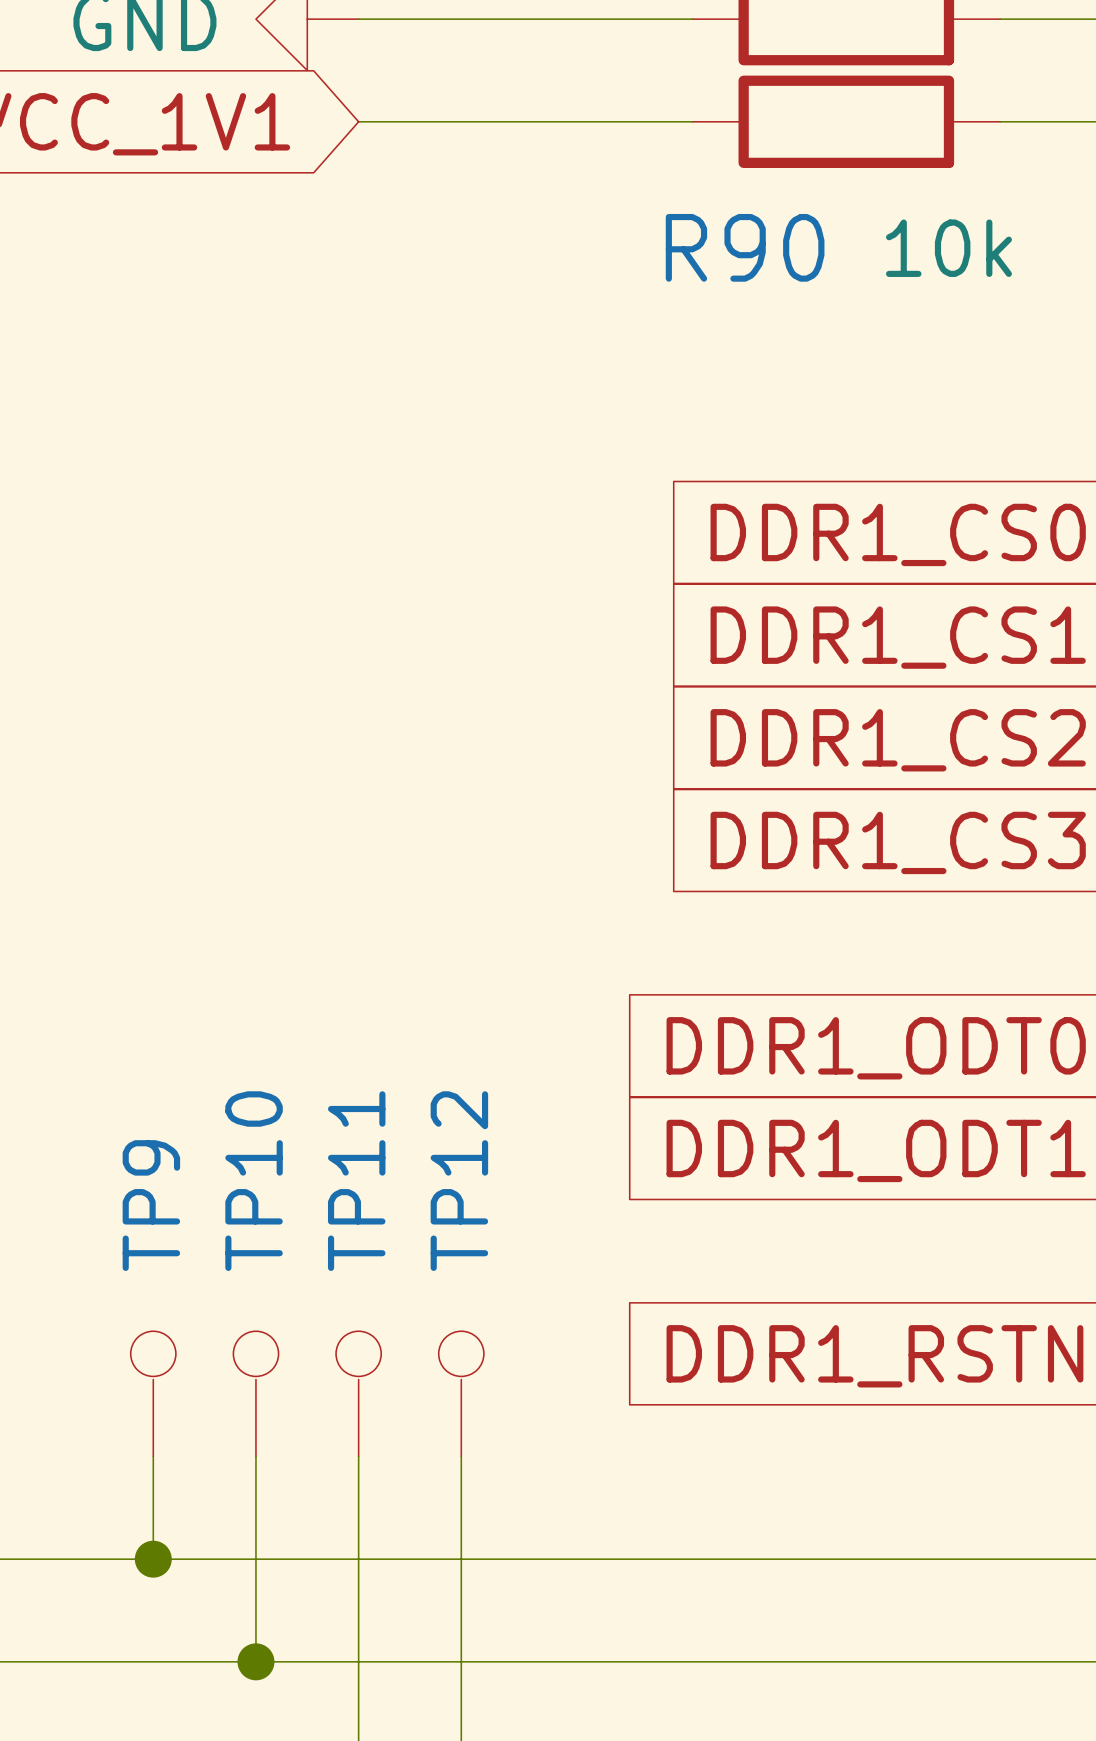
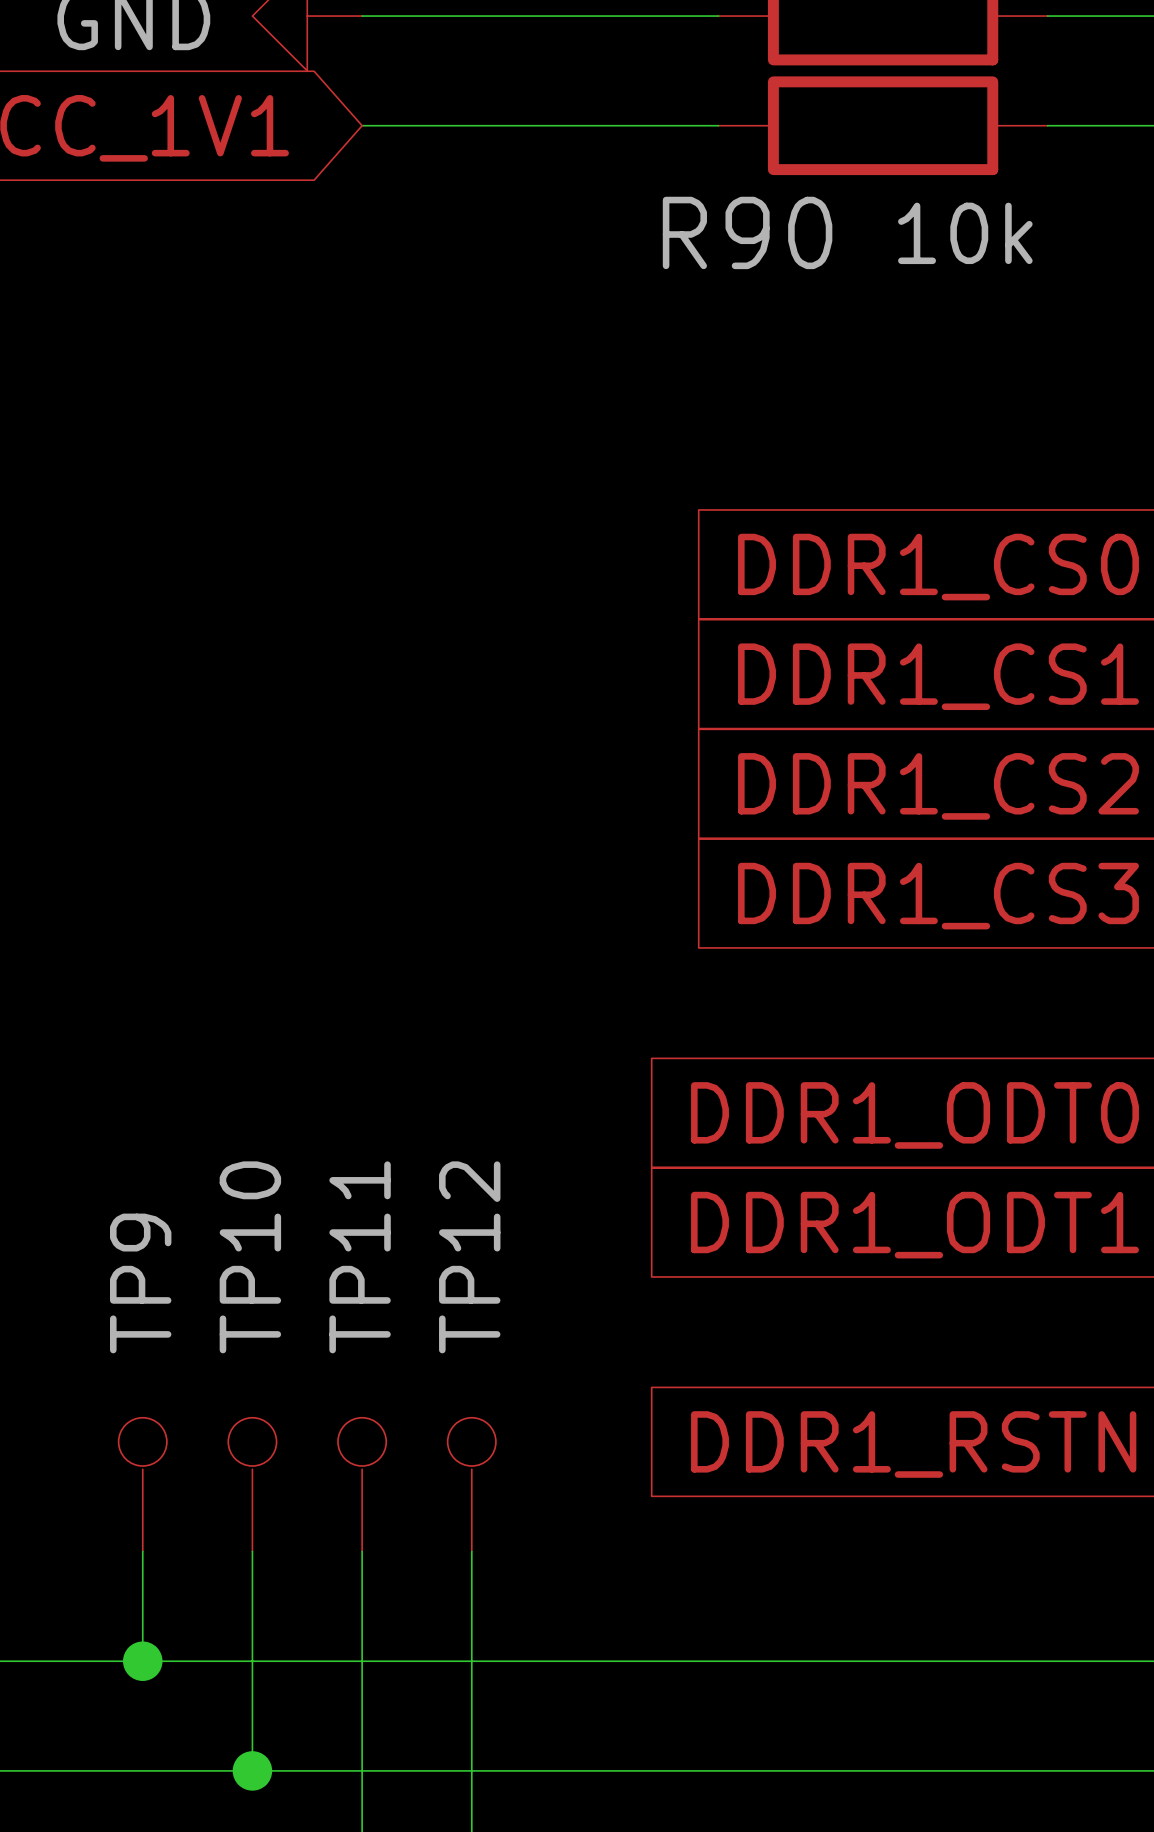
R90 name position: R90 (745, 247) -> R90 (747, 232)
R90 text position: 10k (948, 248) -> 10k (965, 233)

